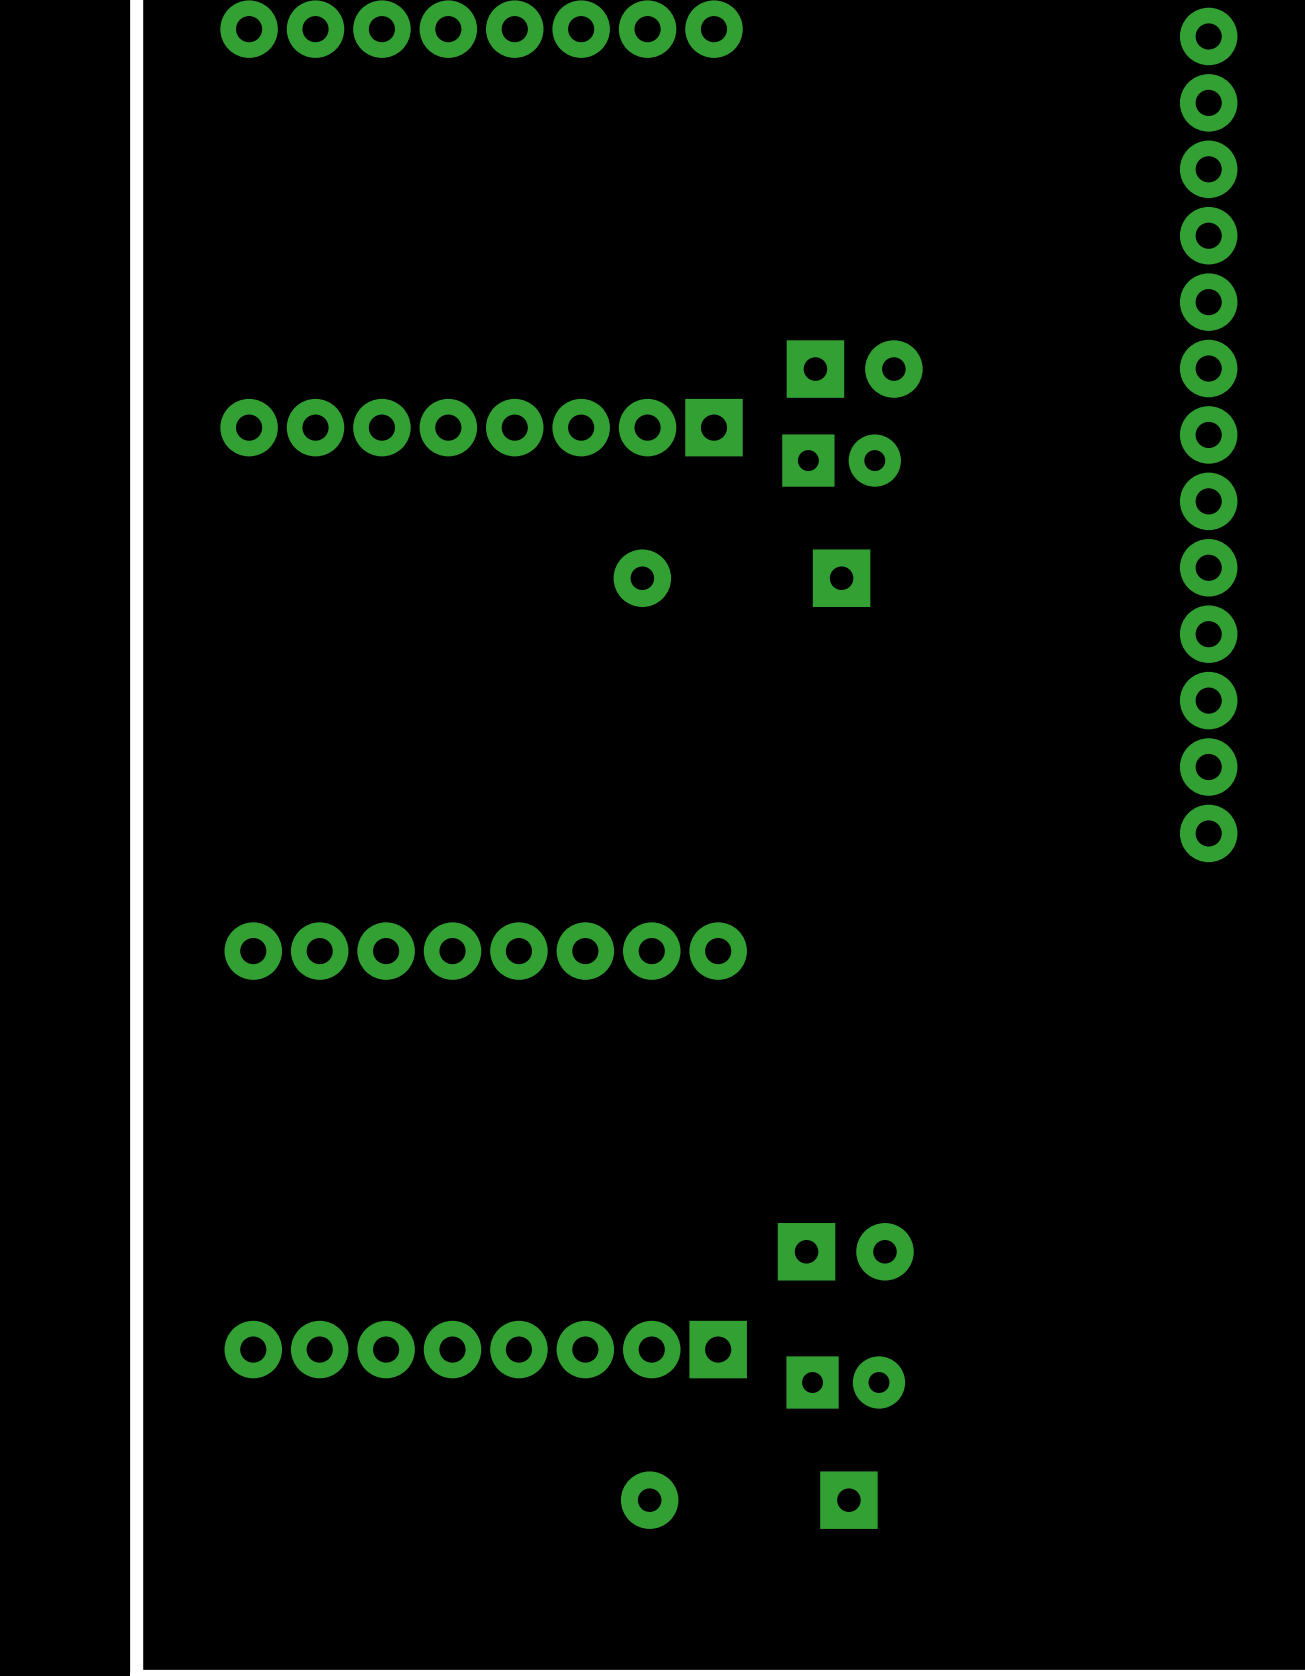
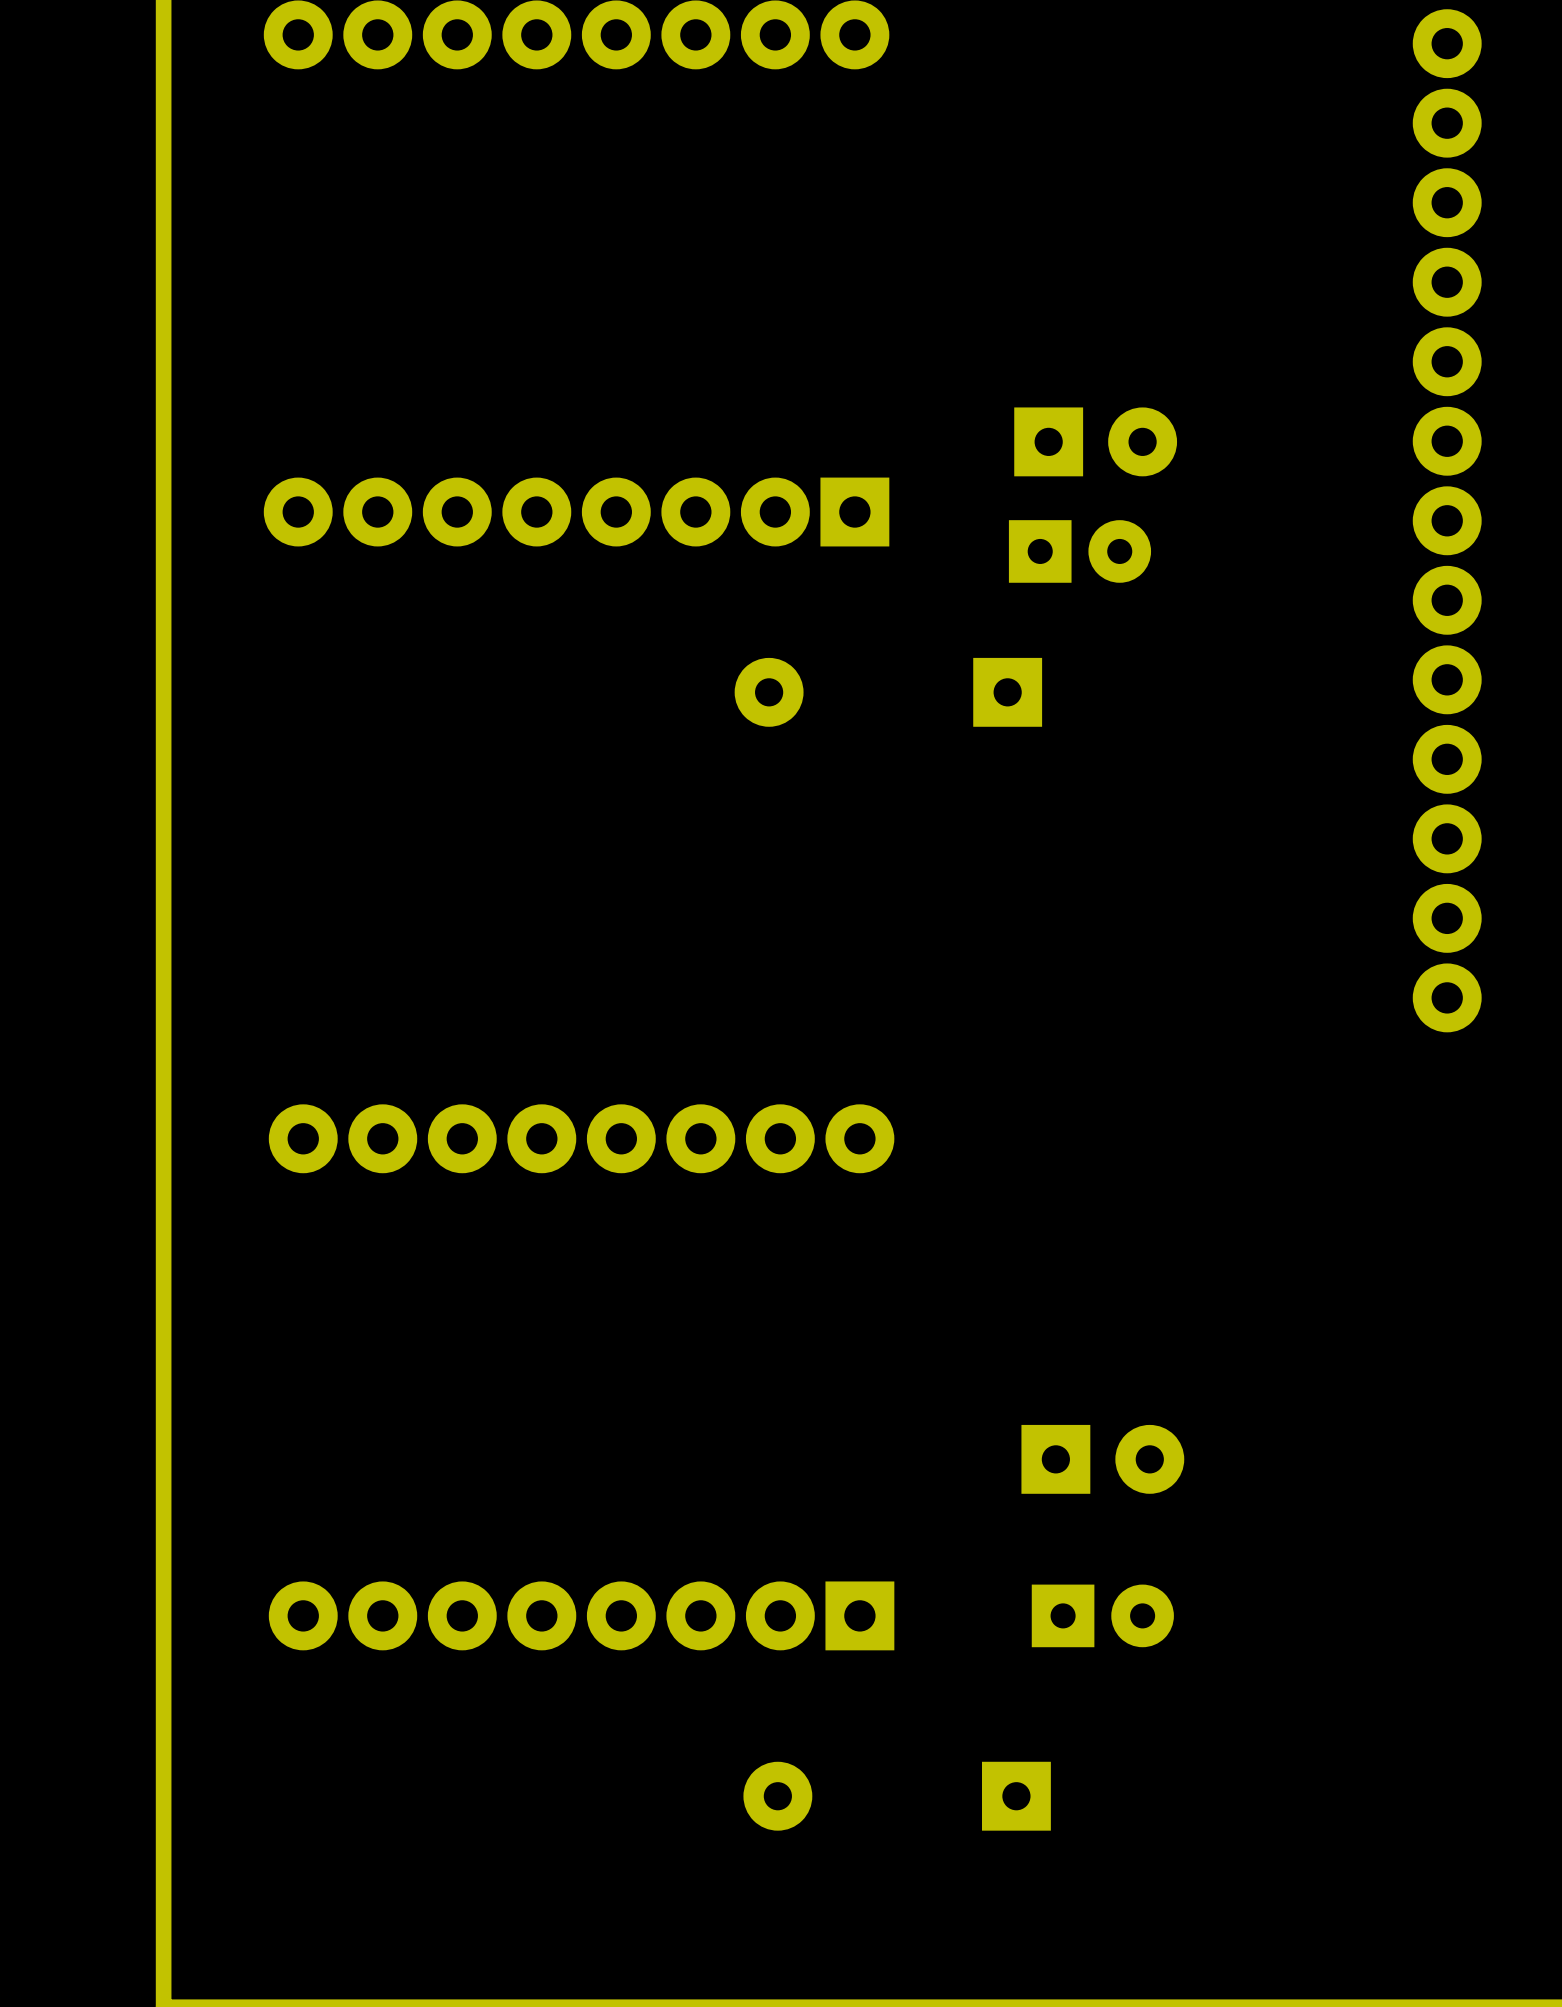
part position: (854, 369) -> (1095, 441)
part position: (841, 460) -> (1079, 551)
part position: (845, 1251) -> (1102, 1459)
part position: (845, 1382) -> (1102, 1615)

